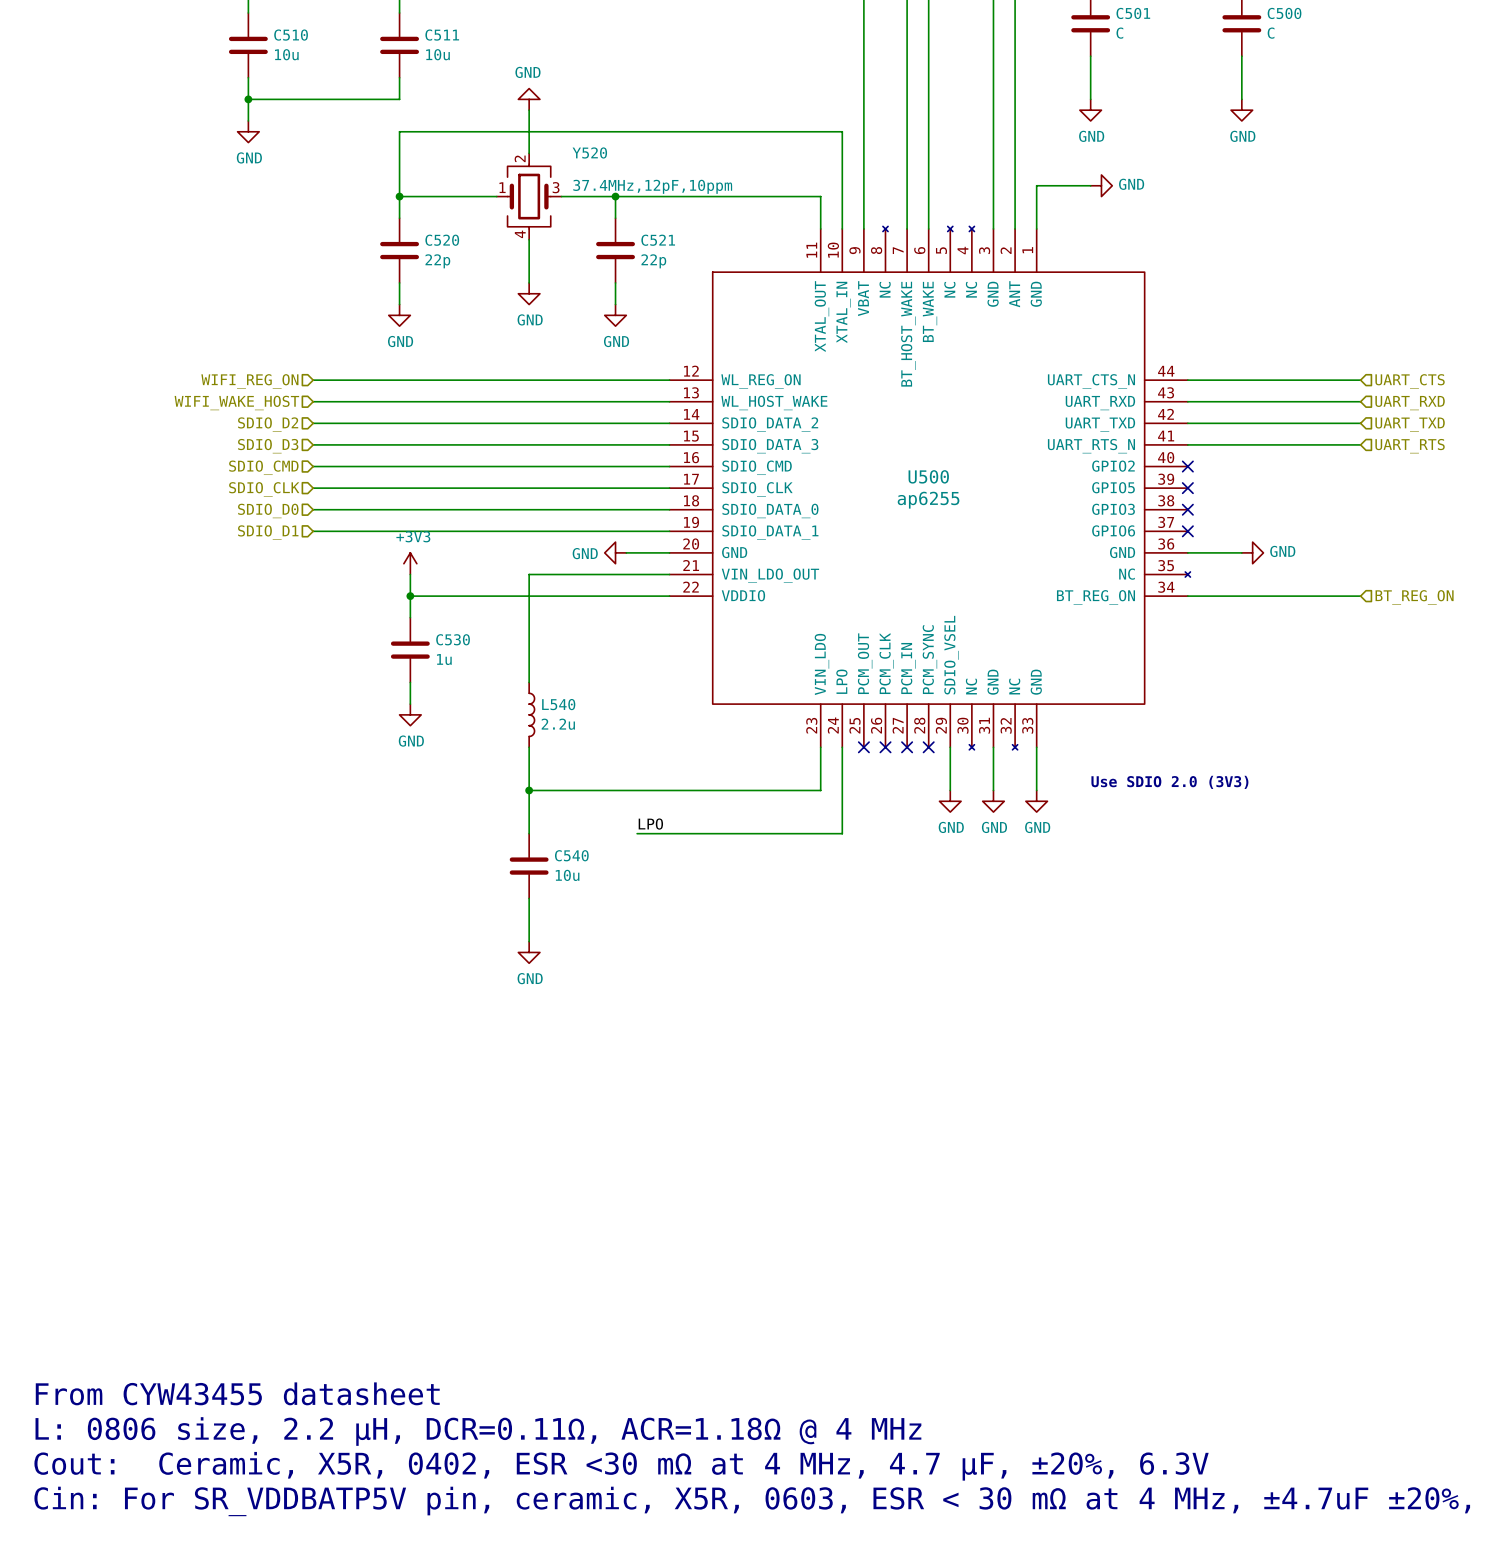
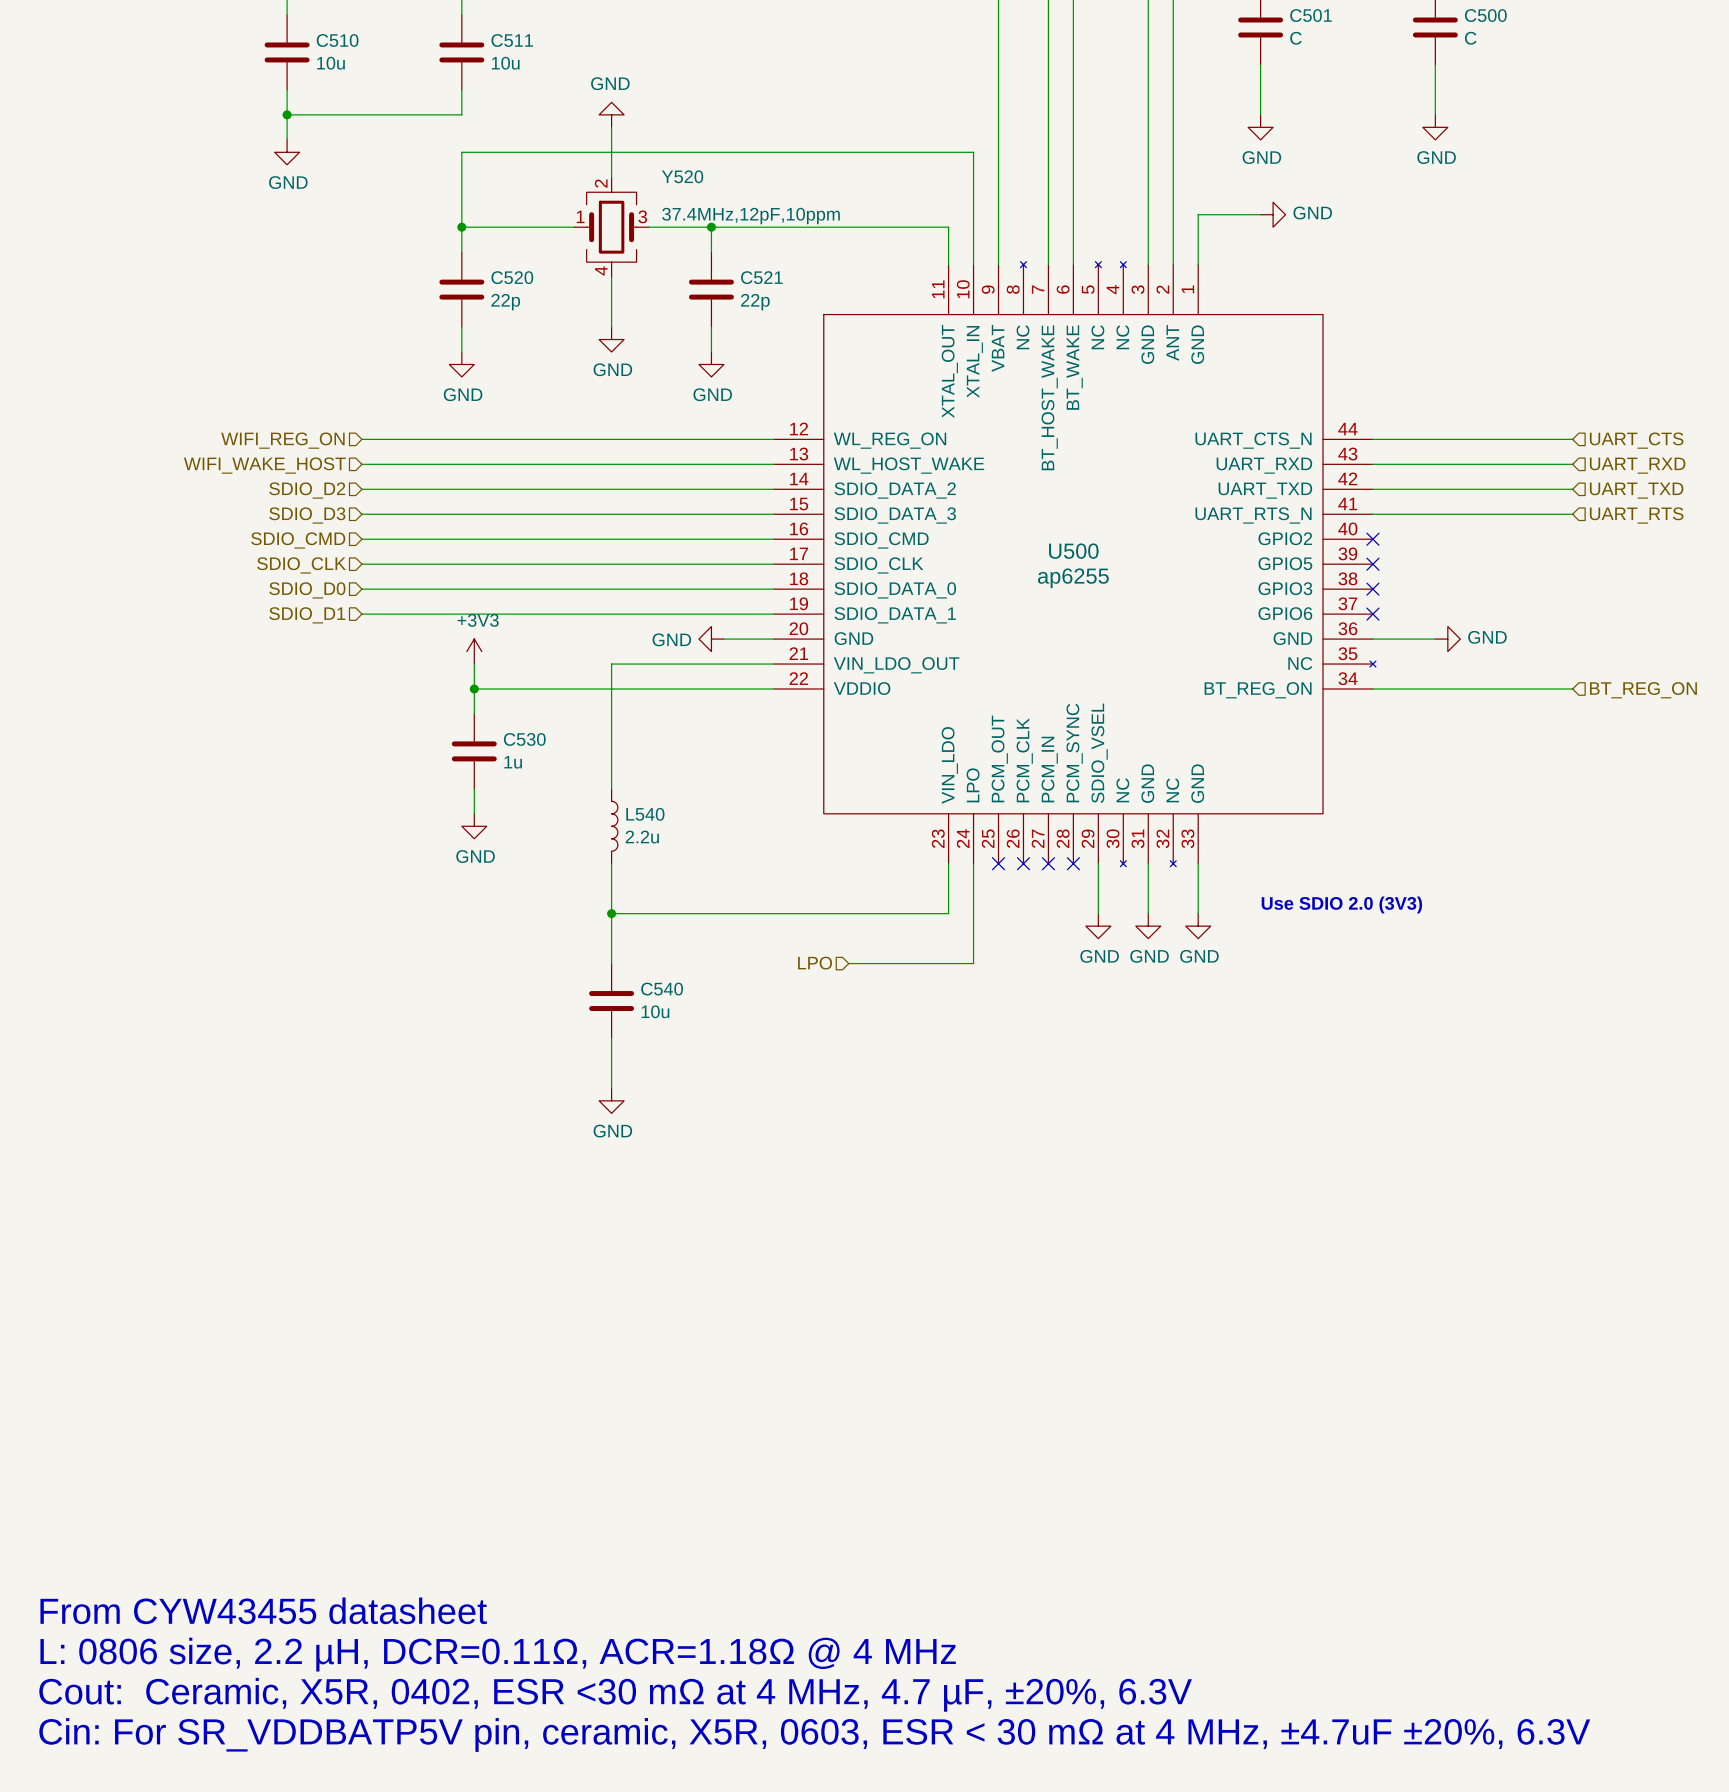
label: LPO (650, 824) -> none
wire: (637, 833) (734, 833) -> none
hierarchical label: none -> LPO (815, 963)

